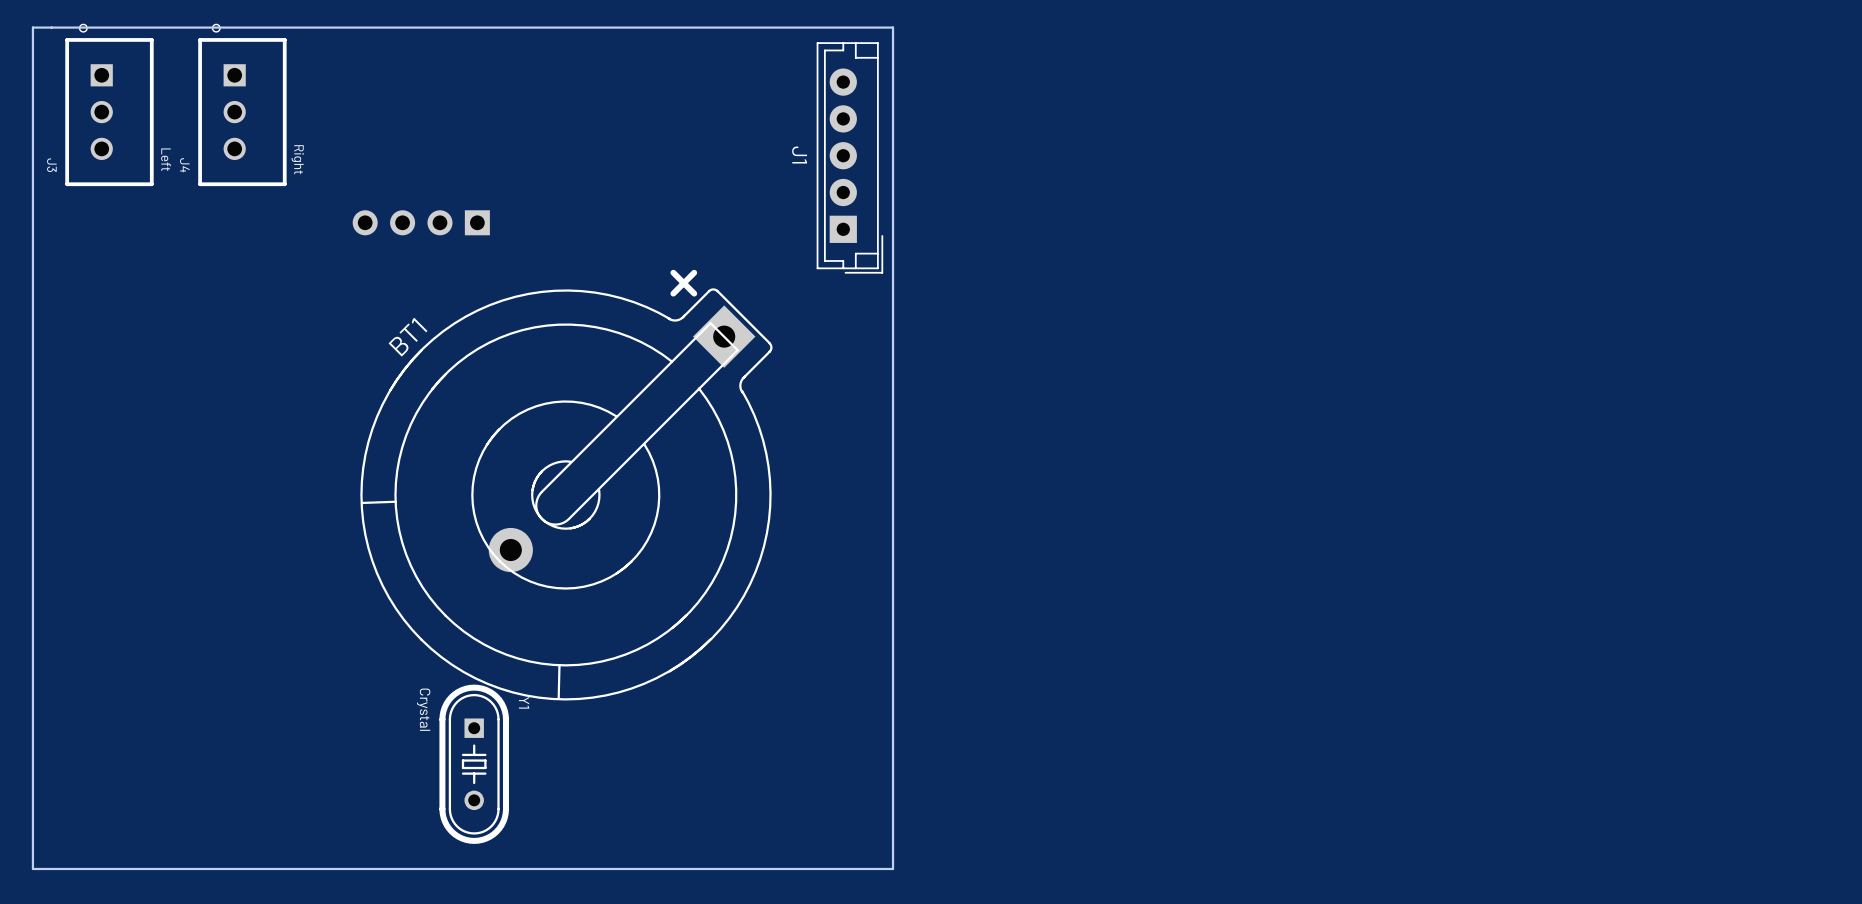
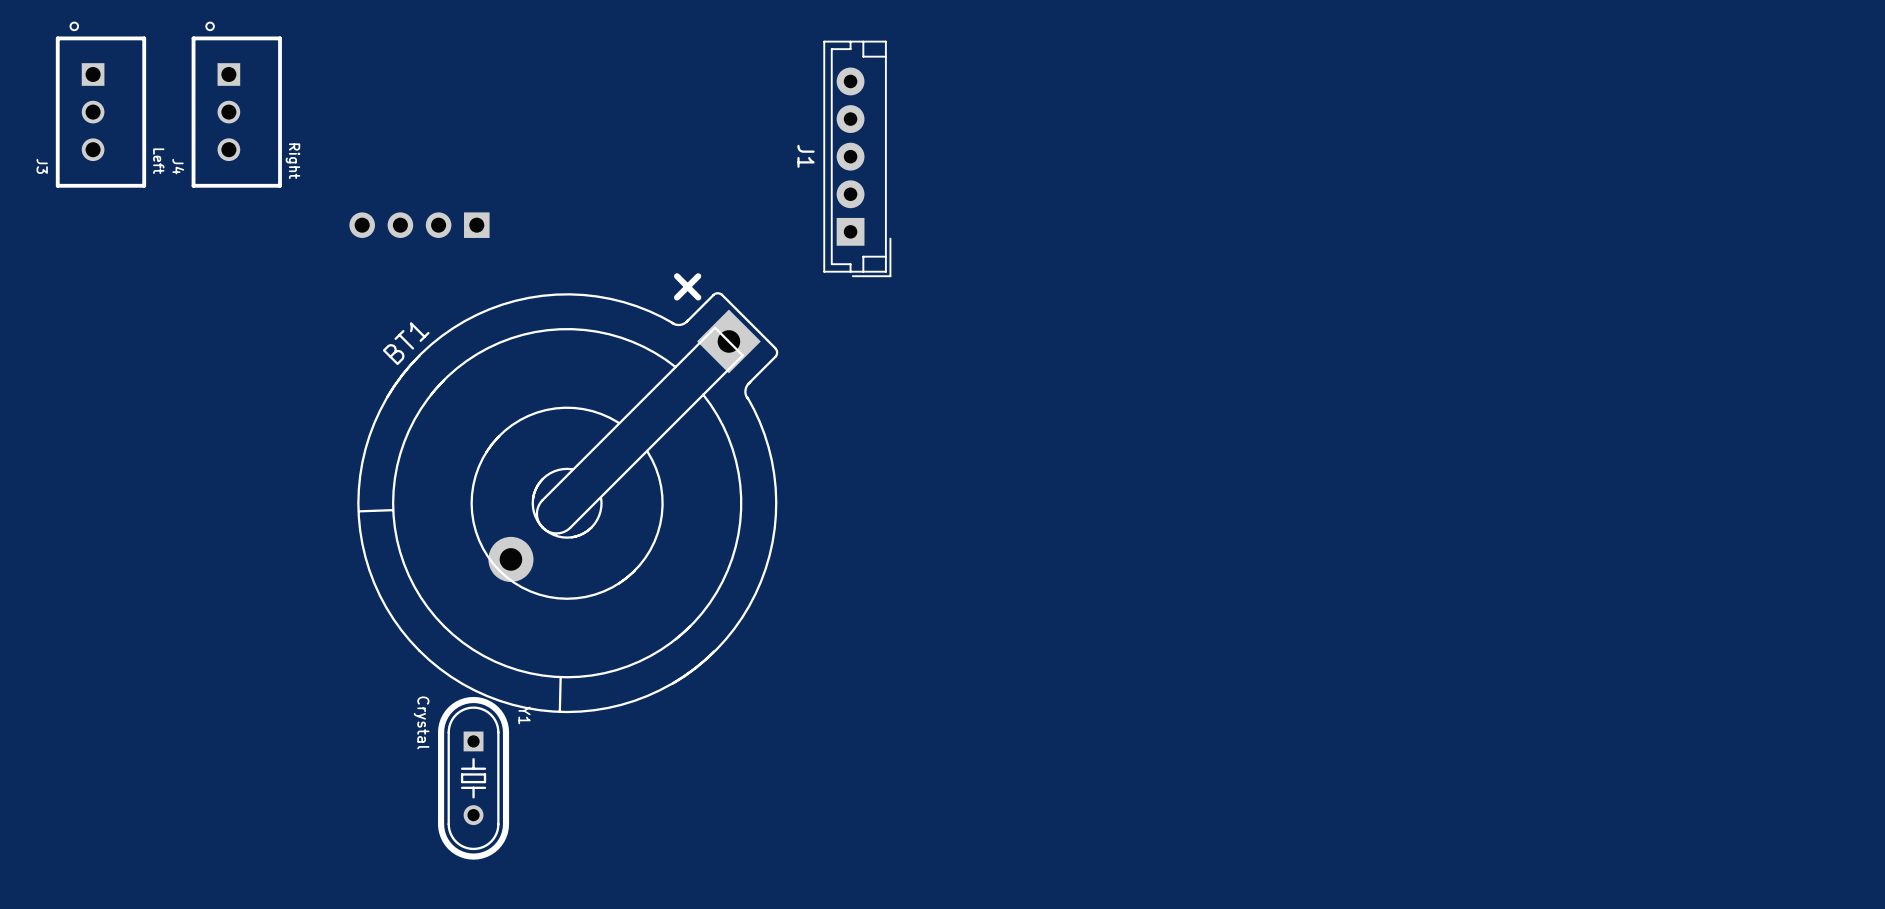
board edge: (893, 27) (893, 868) (32, 868) (32, 27) (893, 27) -> none

